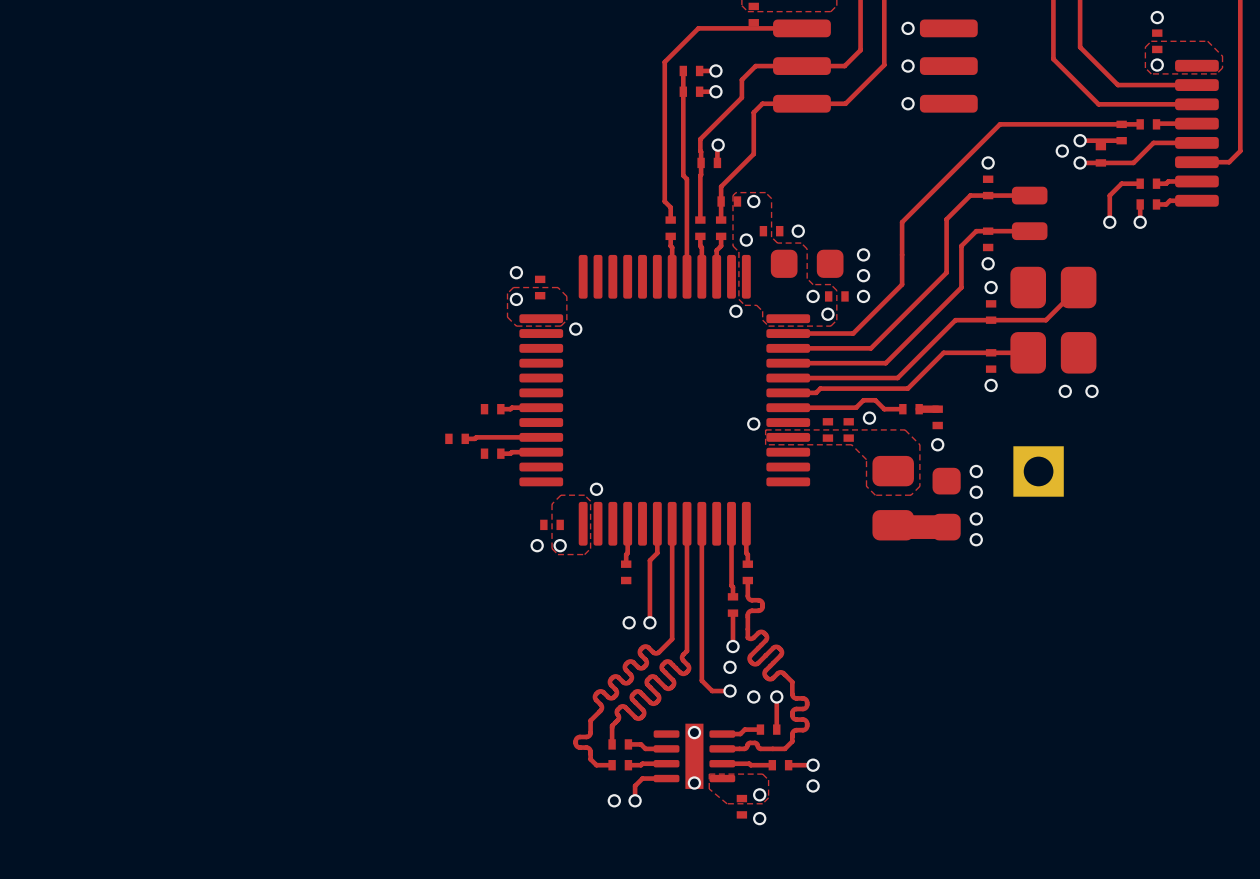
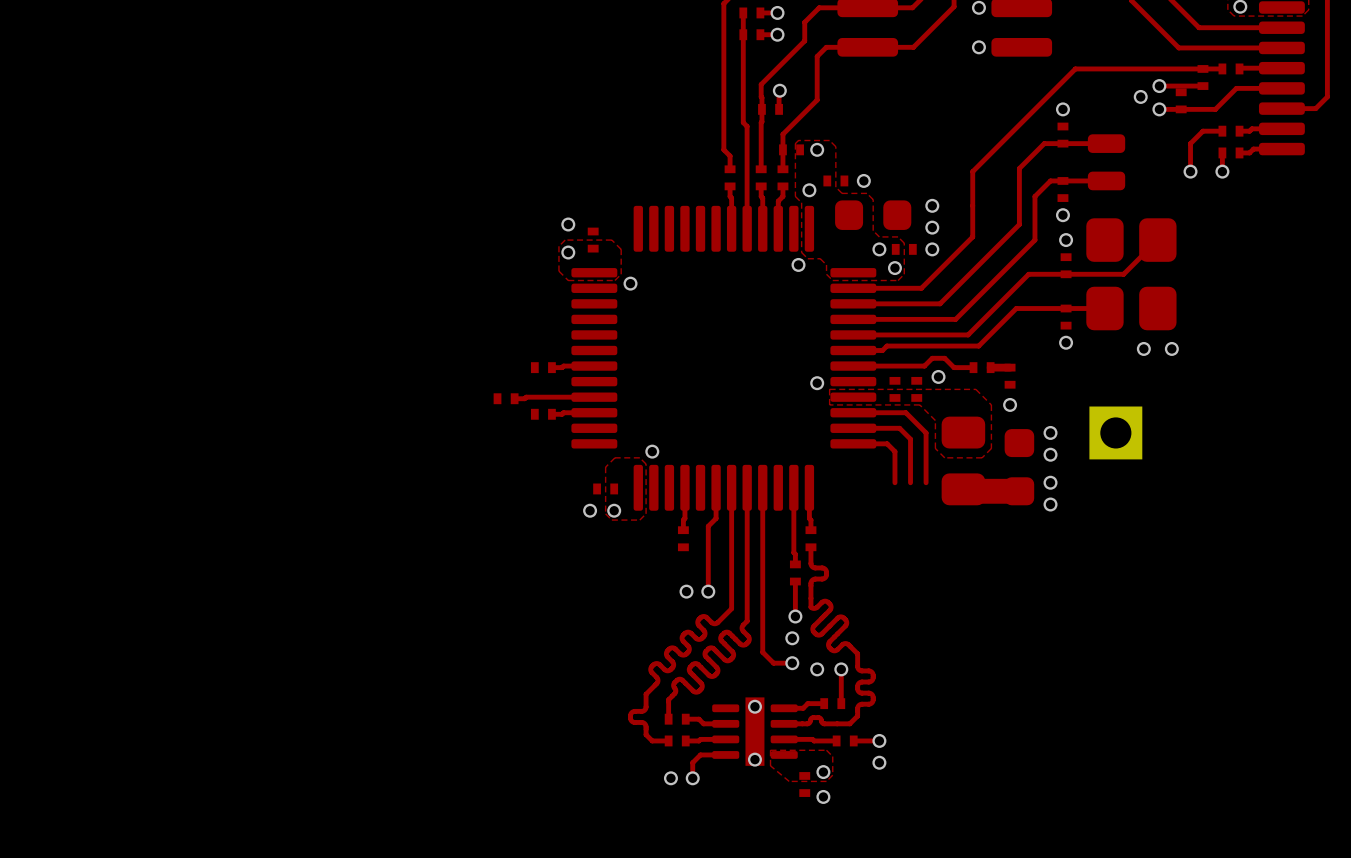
top track: none -> (853, 412) (905, 412) (926, 432) (926, 482)
top track: none -> (853, 428) (899, 428) (910, 439) (910, 482)
top track: none -> (853, 443) (887, 443) (894, 451) (894, 482)

